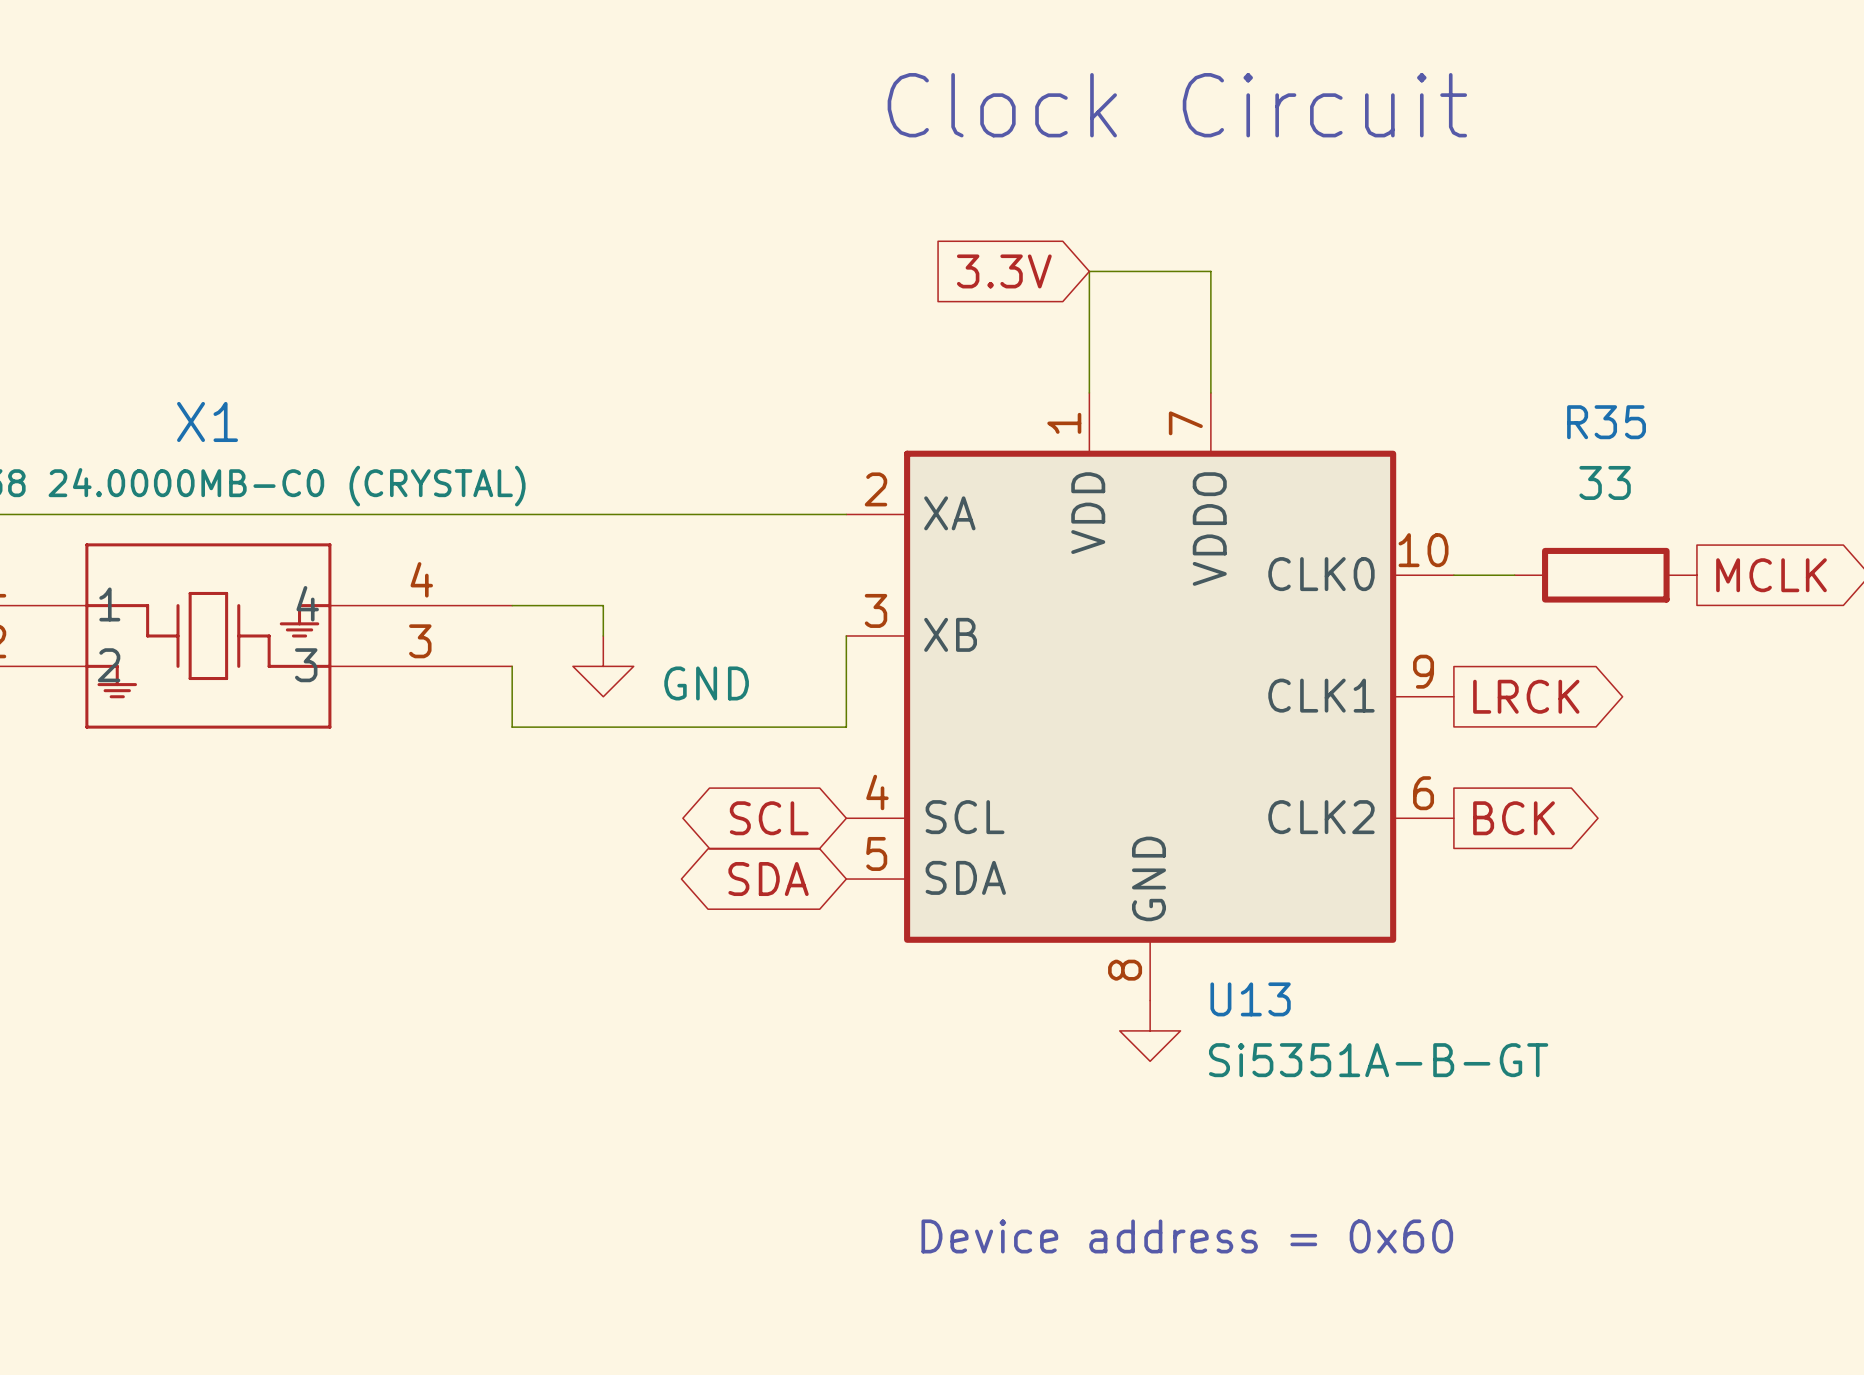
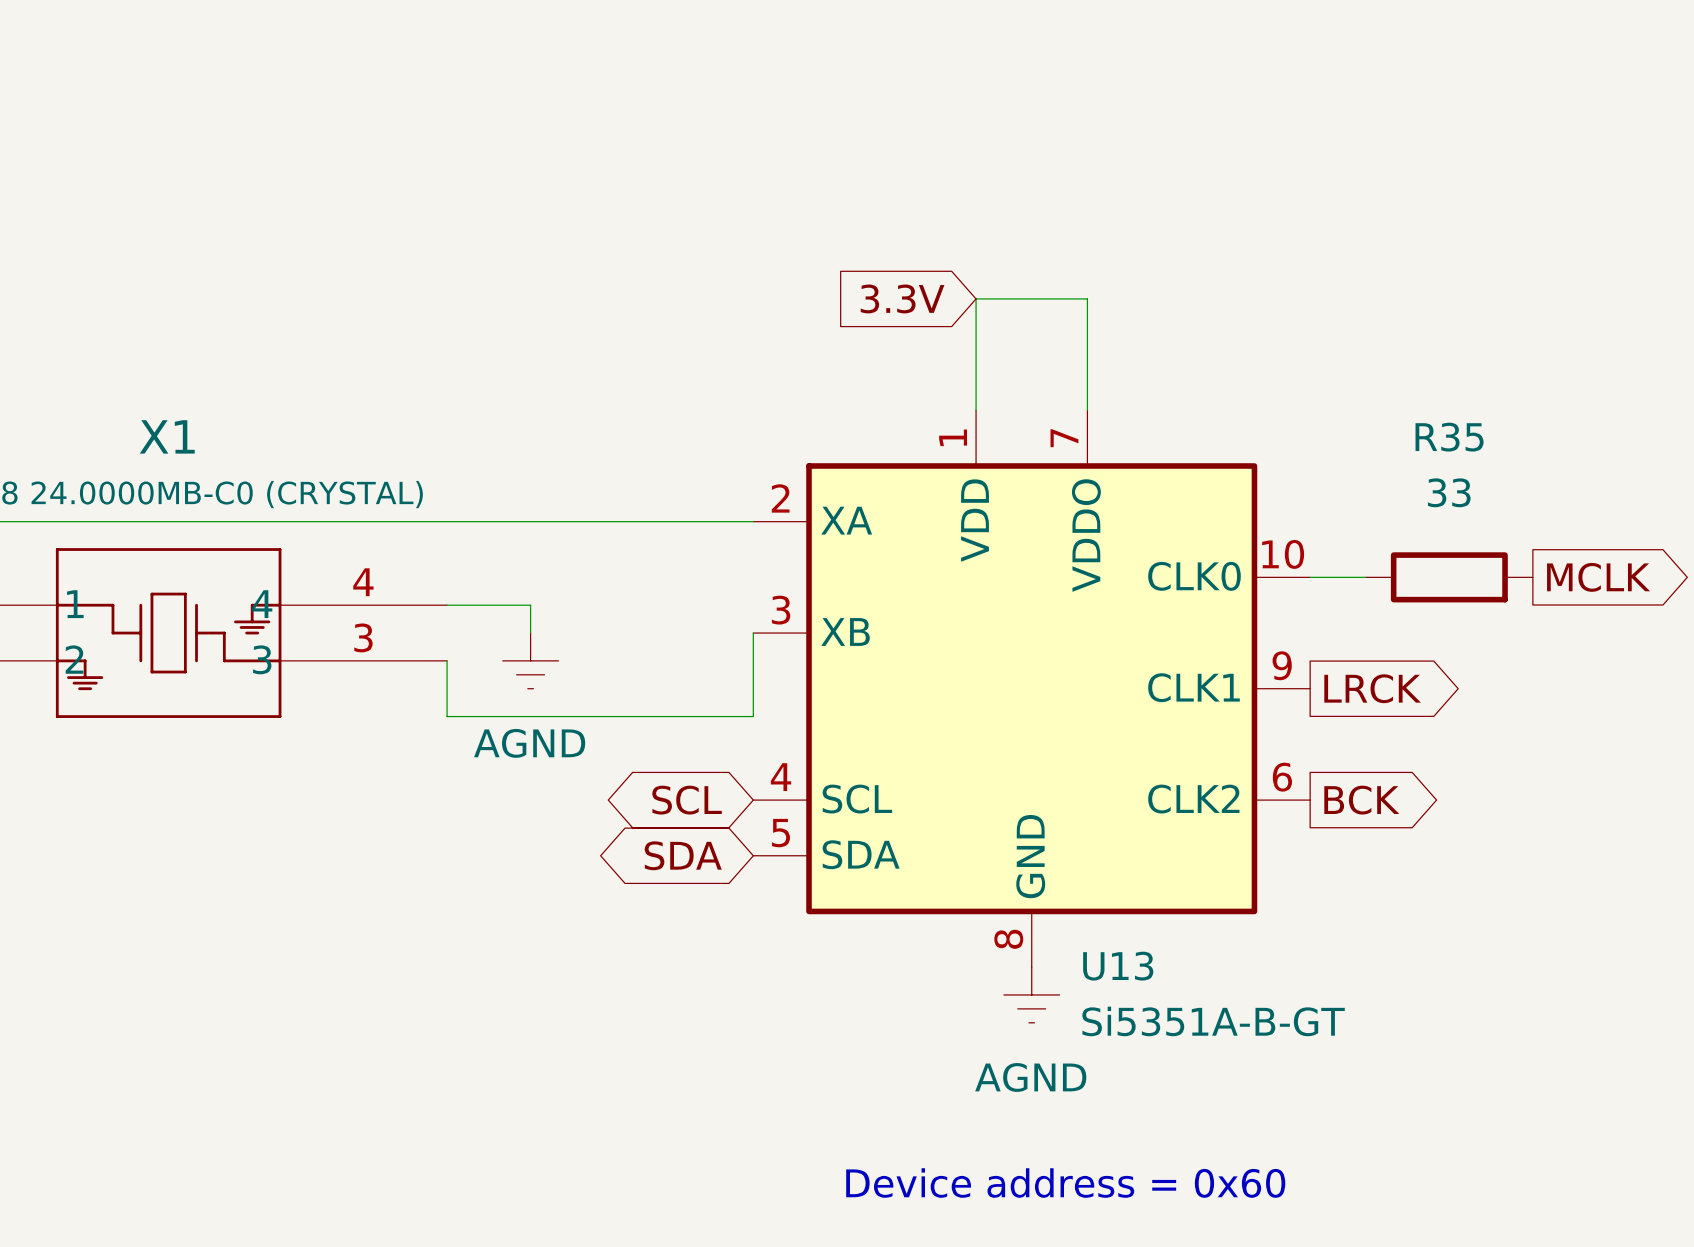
text: Clock Circuit (1177, 105) -> none
power symbol: GND (603, 666) -> AGND (530, 660)
power symbol shape: [1119, 1000, 1181, 1062] -> [1003, 967, 1060, 1023]
power symbol text: none -> AGND (1030, 1077)

